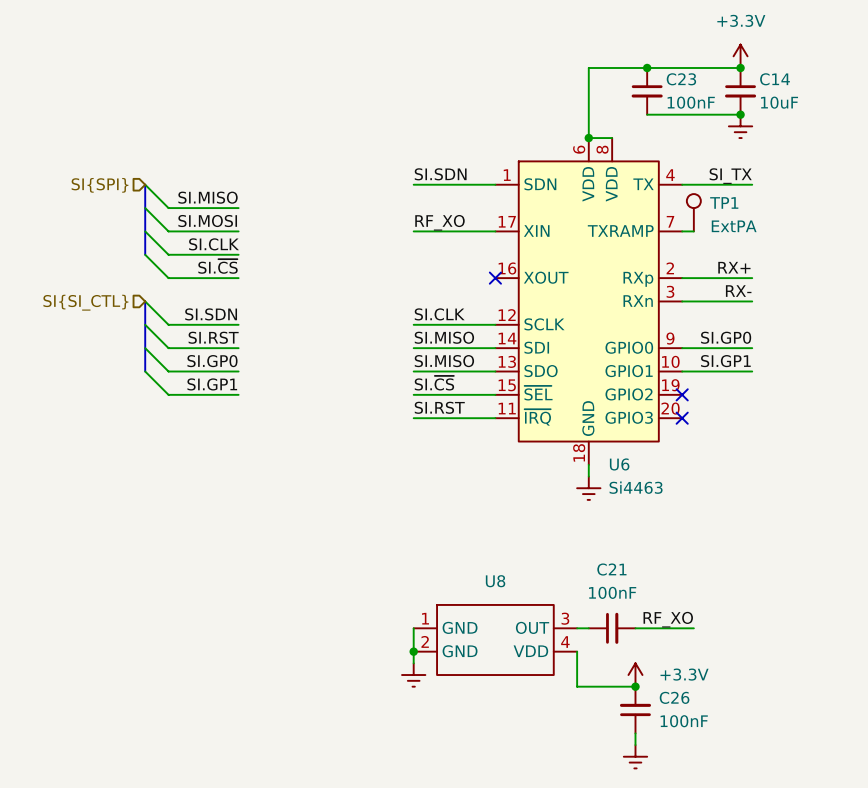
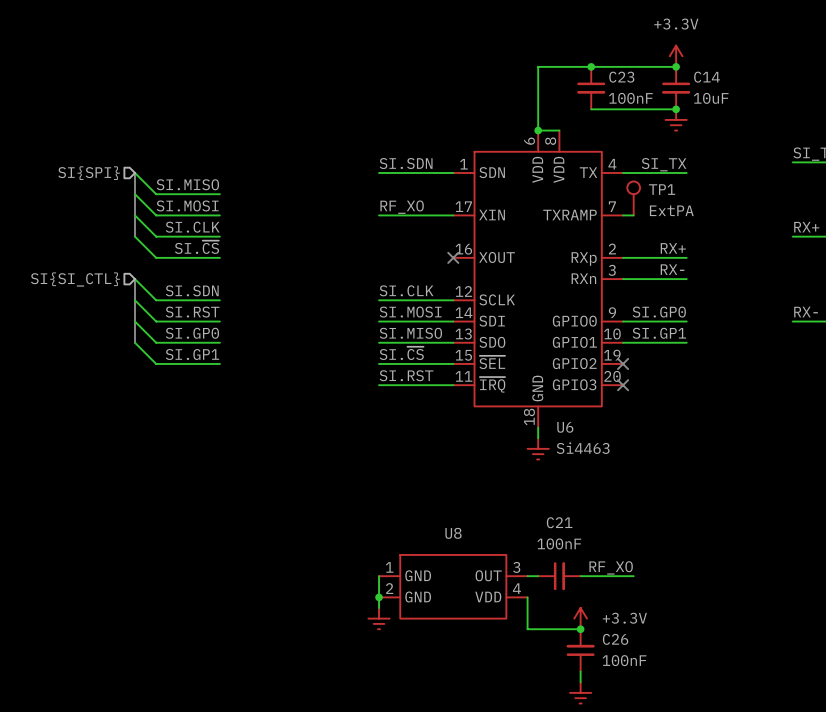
label: SI.MISO (444, 337) -> SI.MOSI (410, 312)

